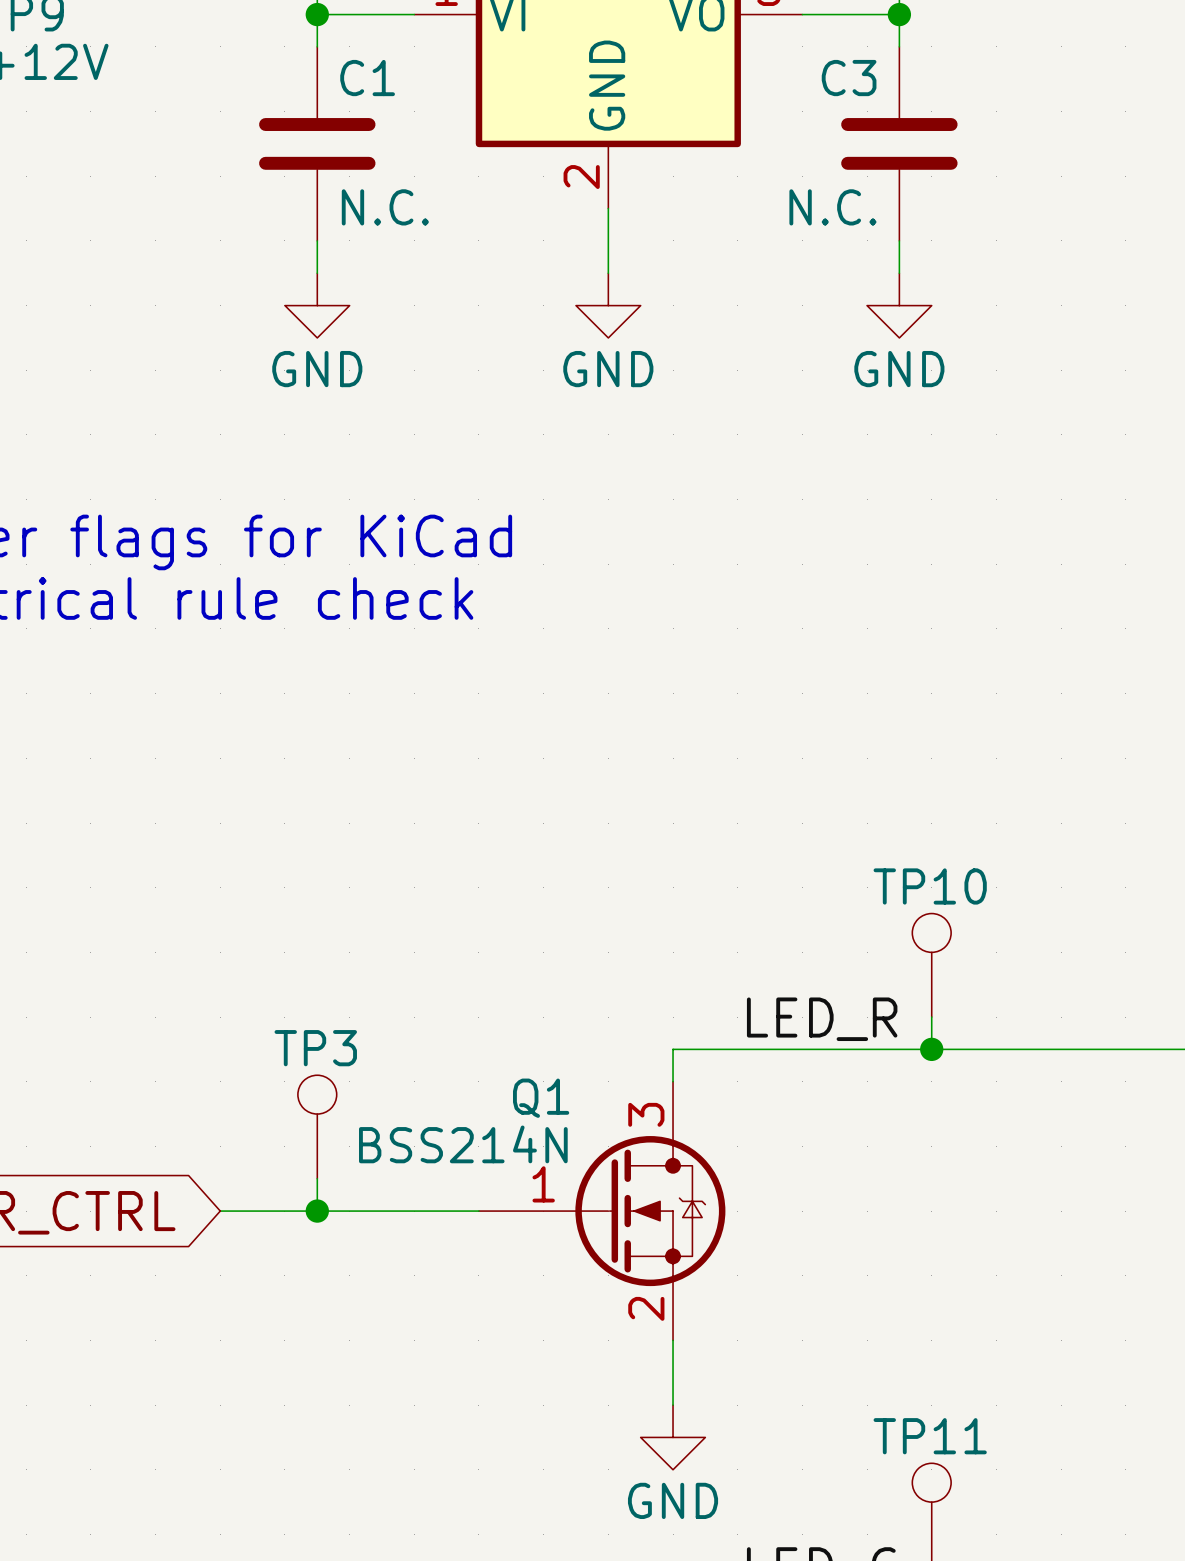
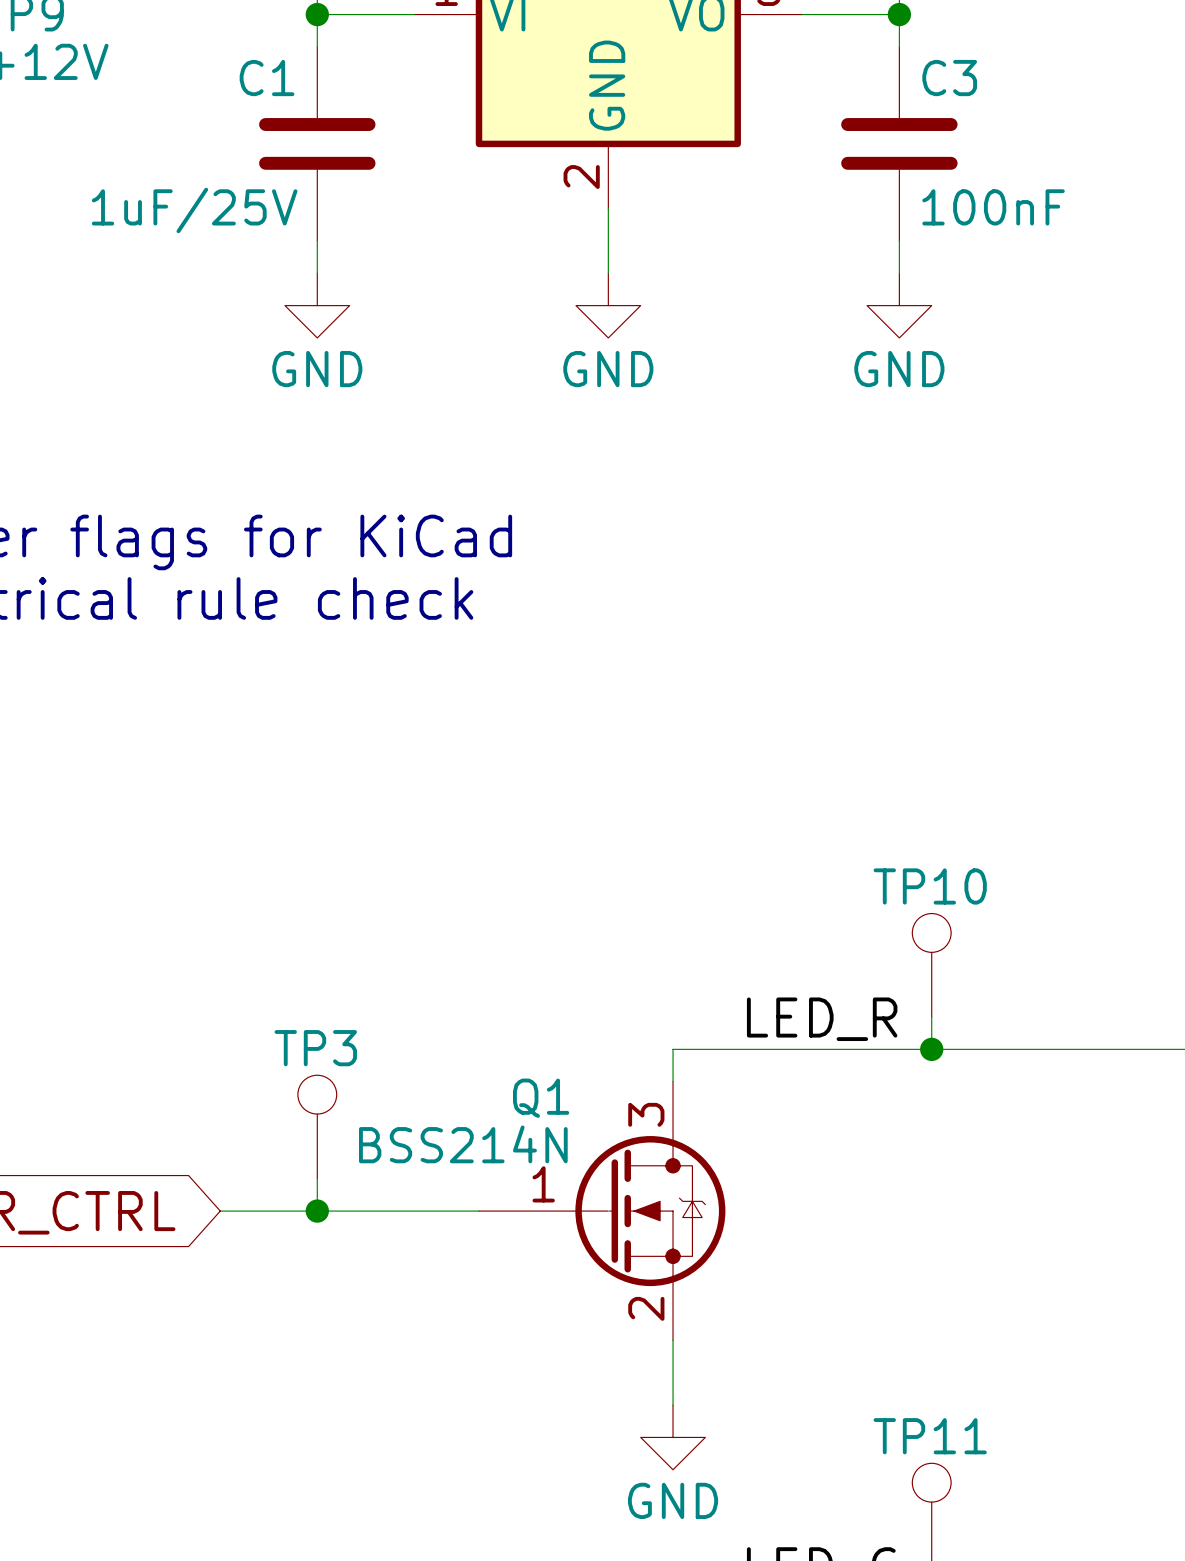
C1 name position: C1 (367, 78) -> C1 (267, 78)
C3 name position: C3 (849, 78) -> C3 (949, 78)
C1 value: N.C. (385, 207) -> 1uF/25V (194, 210)
C3 value: N.C. (832, 207) -> 100nF (993, 207)

